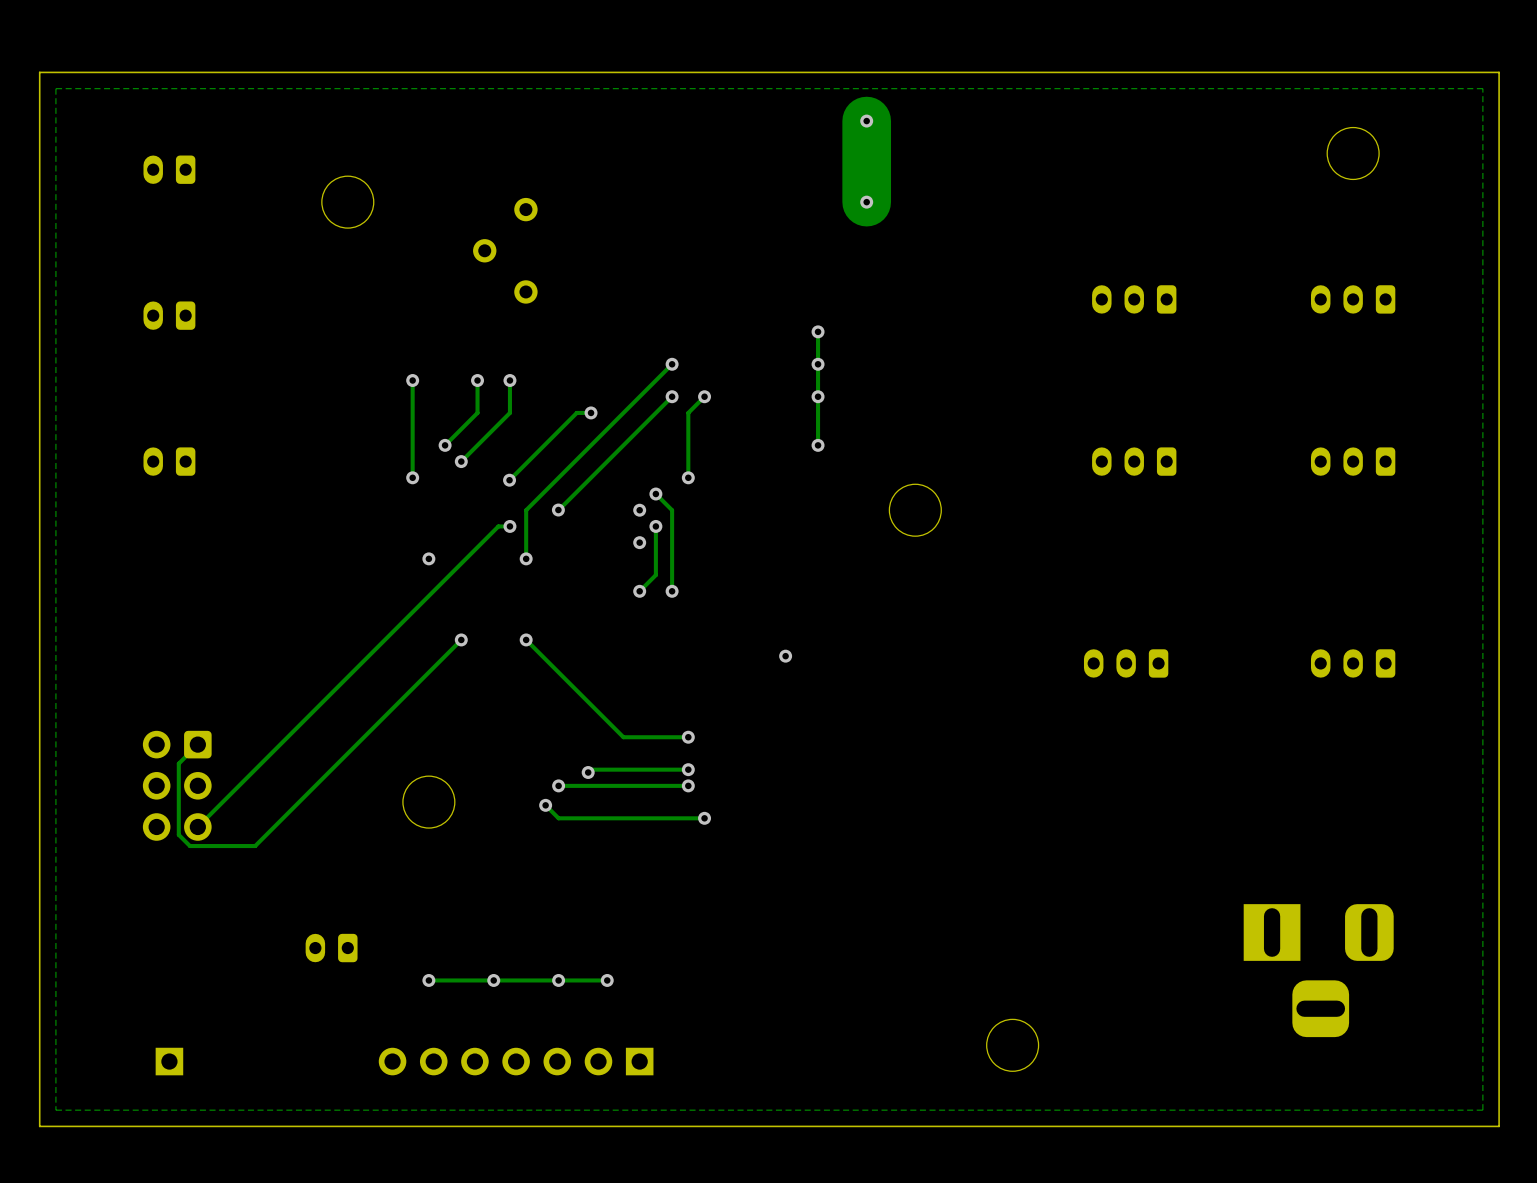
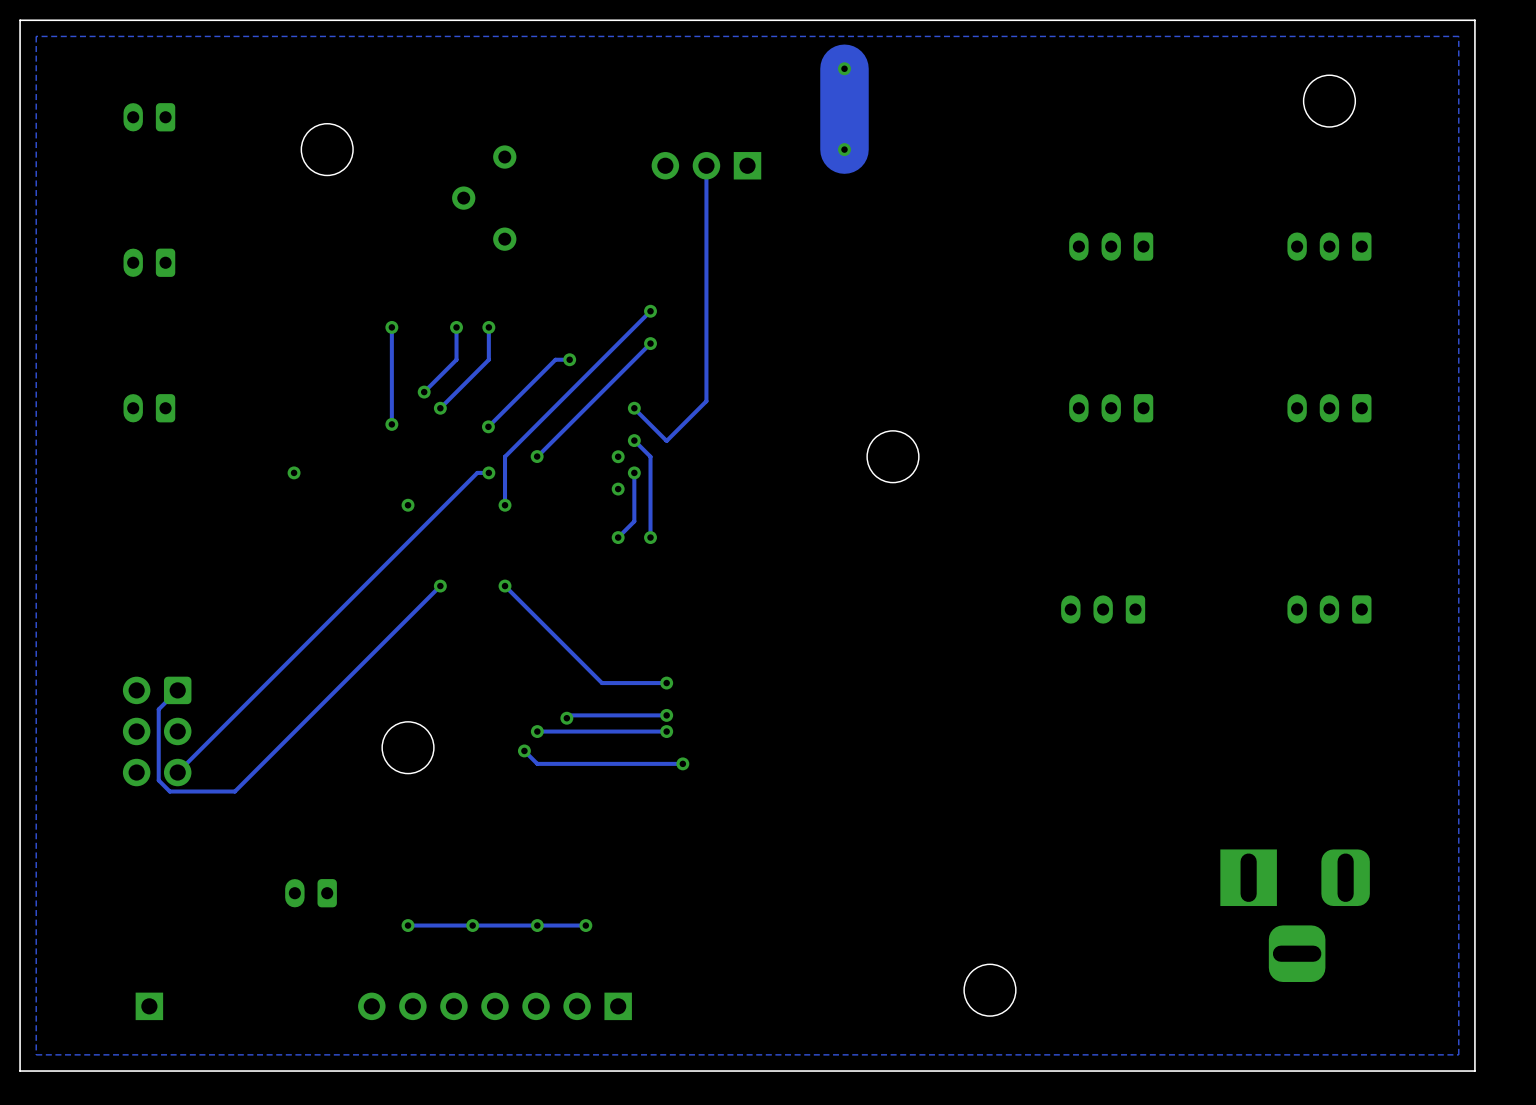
track: none -> (706, 165) (706, 401) (667, 440) (634, 408)
part: none -> (706, 165)
track: (818, 331) (818, 445) -> none
via: (818, 331) -> none
via: (818, 364) -> none
track: (704, 396) (688, 412) (688, 477) -> none
via: (704, 396) -> none
via: (818, 396) -> none
via: (818, 445) -> none
via position: (688, 477) -> (634, 408)
via: none -> (294, 472)
via: (785, 656) -> none

